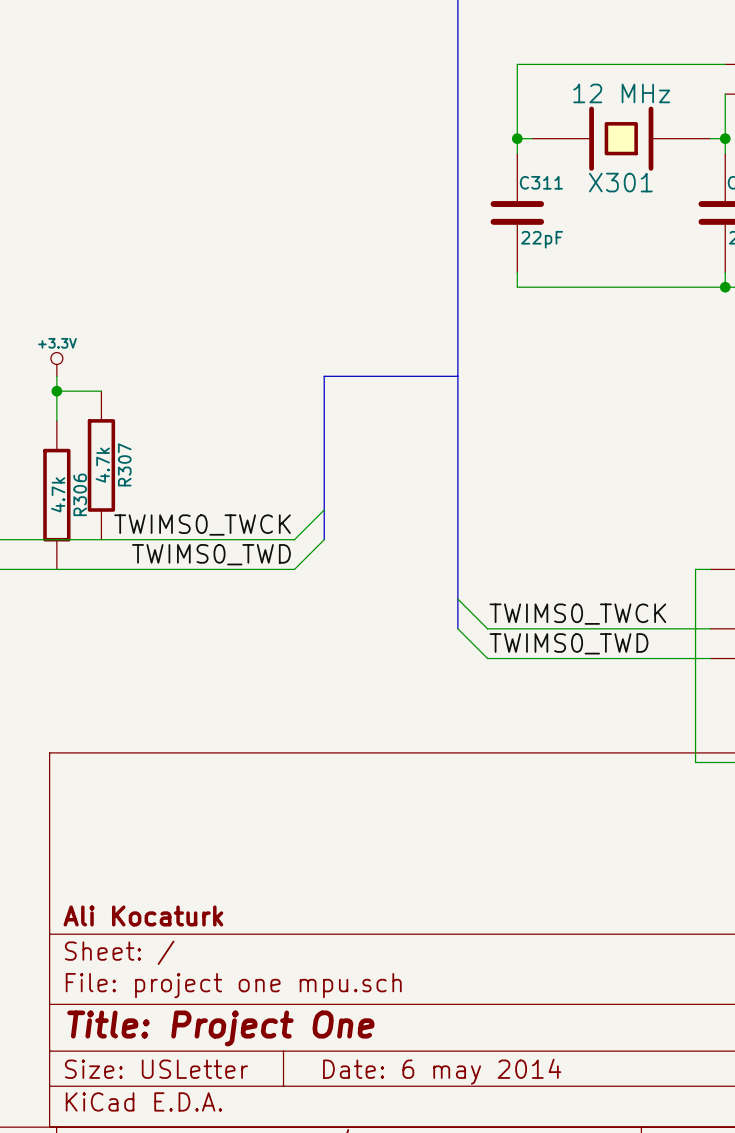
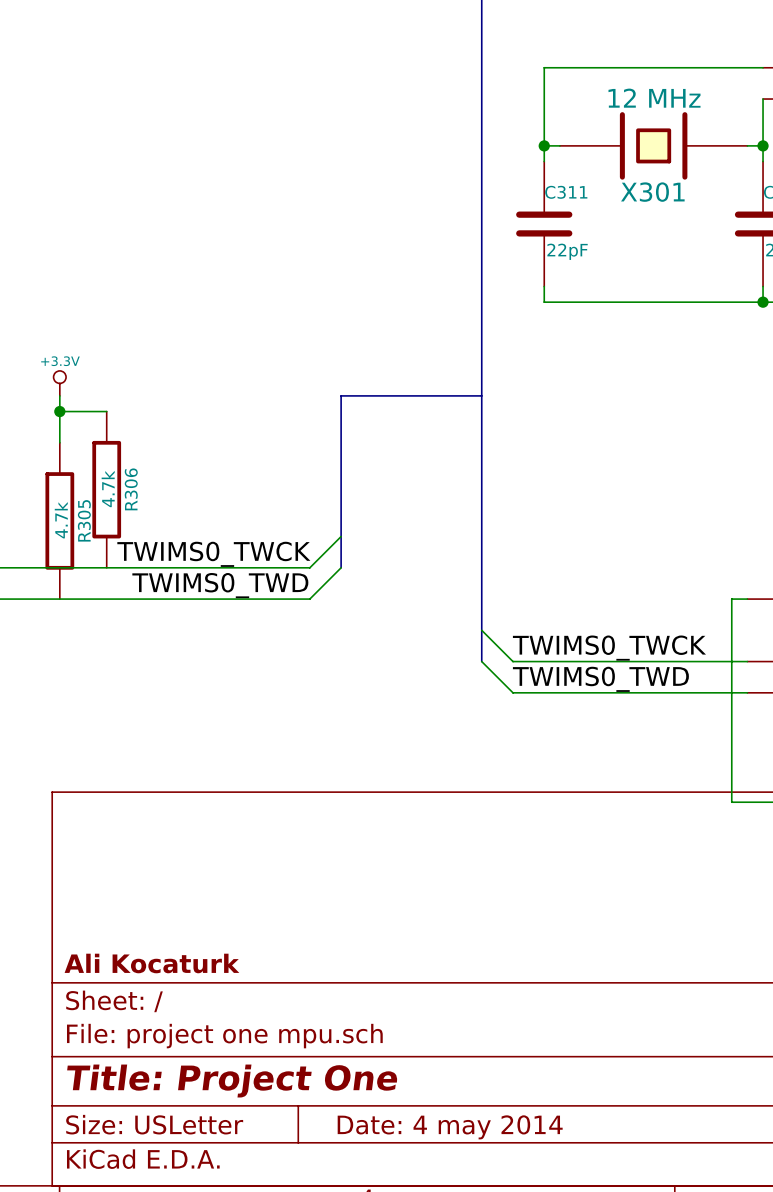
R307 name: R307 (124, 464) -> R306 (131, 489)
R306 name: R306 (80, 494) -> R305 (84, 520)
title block: Date: 6 may 2014 (442, 1071) -> Date: 4 may 2014 (450, 1127)

